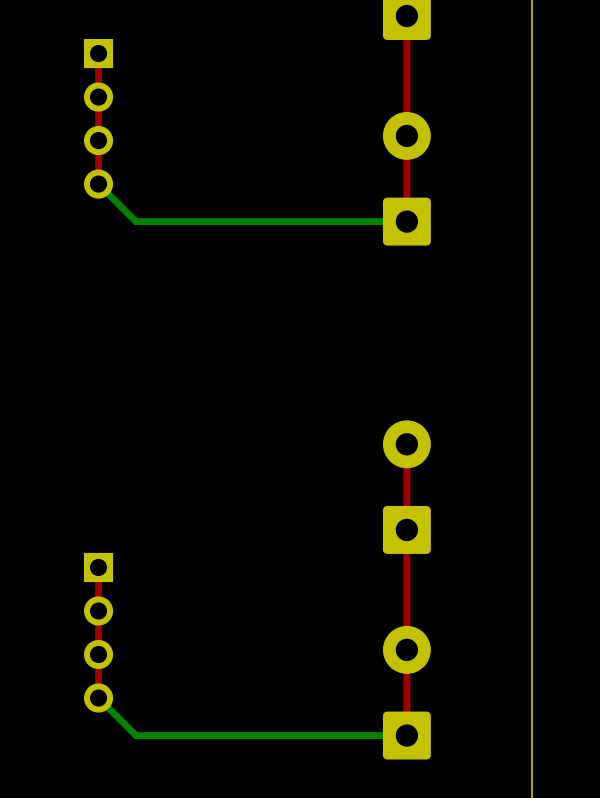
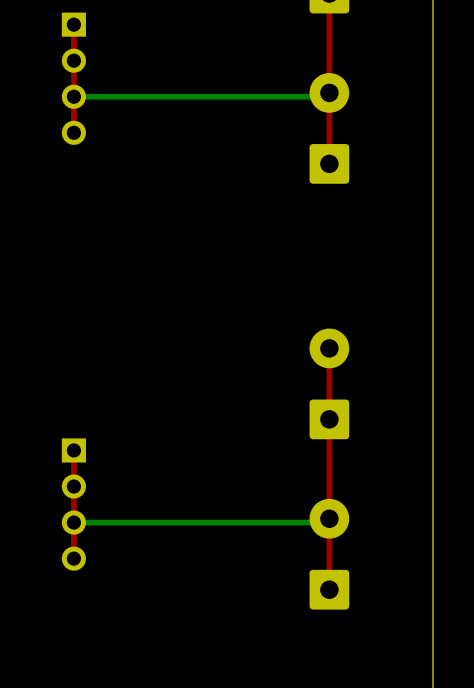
bottom track: none -> (329, 92) (325, 96) (73, 96)
bottom track: (98, 184) (136, 221) (406, 221) -> none
bottom track: none -> (329, 518) (325, 522) (73, 522)
bottom track: (98, 698) (136, 735) (406, 735) -> none

